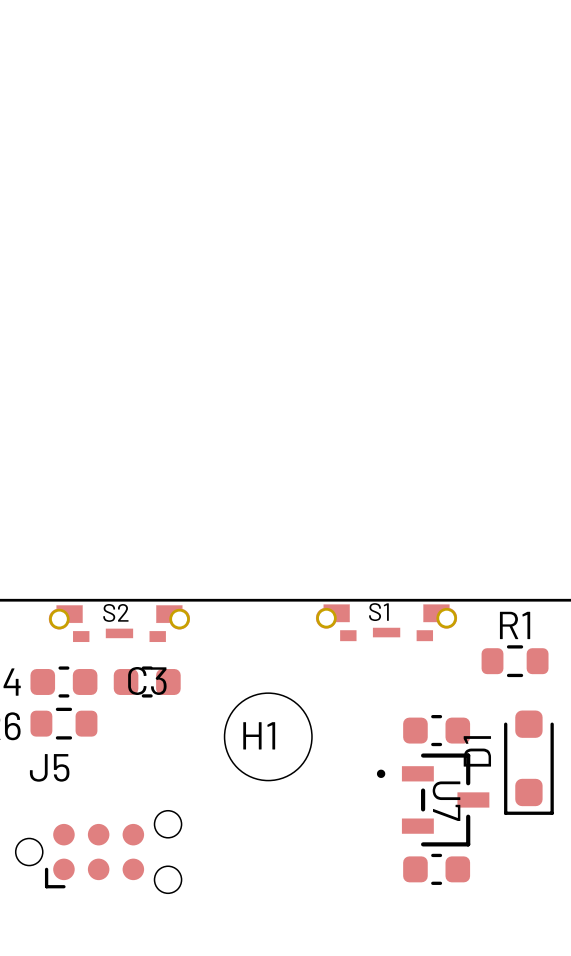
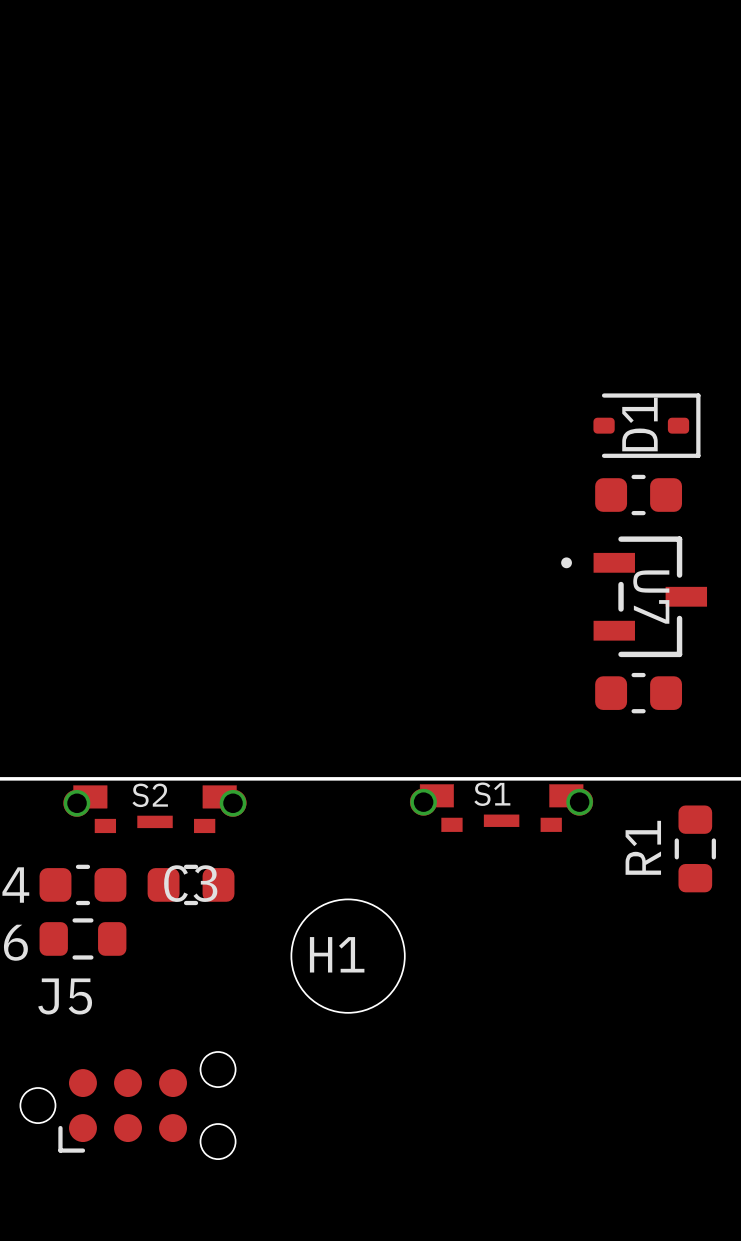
part: none -> (638, 495)
part: none -> (638, 693)
R1 rotation: 0° (515, 661) -> 90° clockwise (695, 848)
D1 footprint: [504, 710, 554, 815] -> [593, 393, 701, 458]
part: (436, 730) -> none
U7 position: (433, 799) -> (634, 596)
part: (436, 869) -> none

